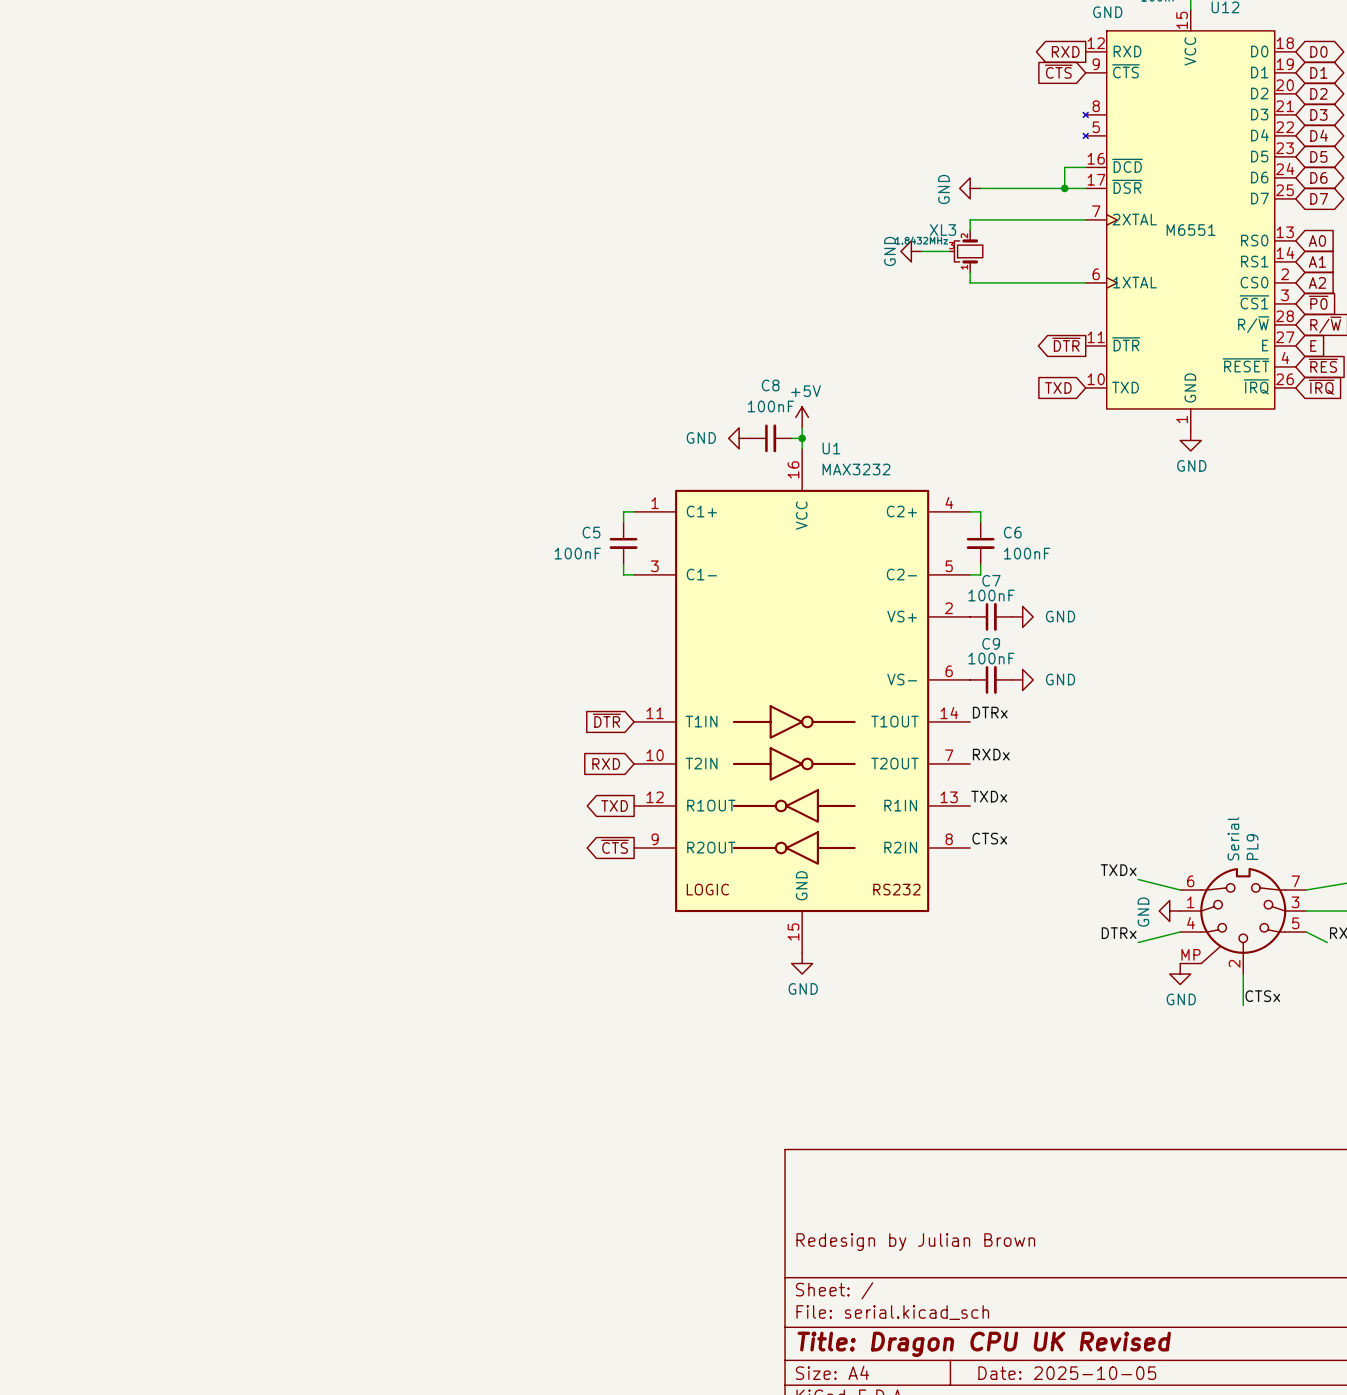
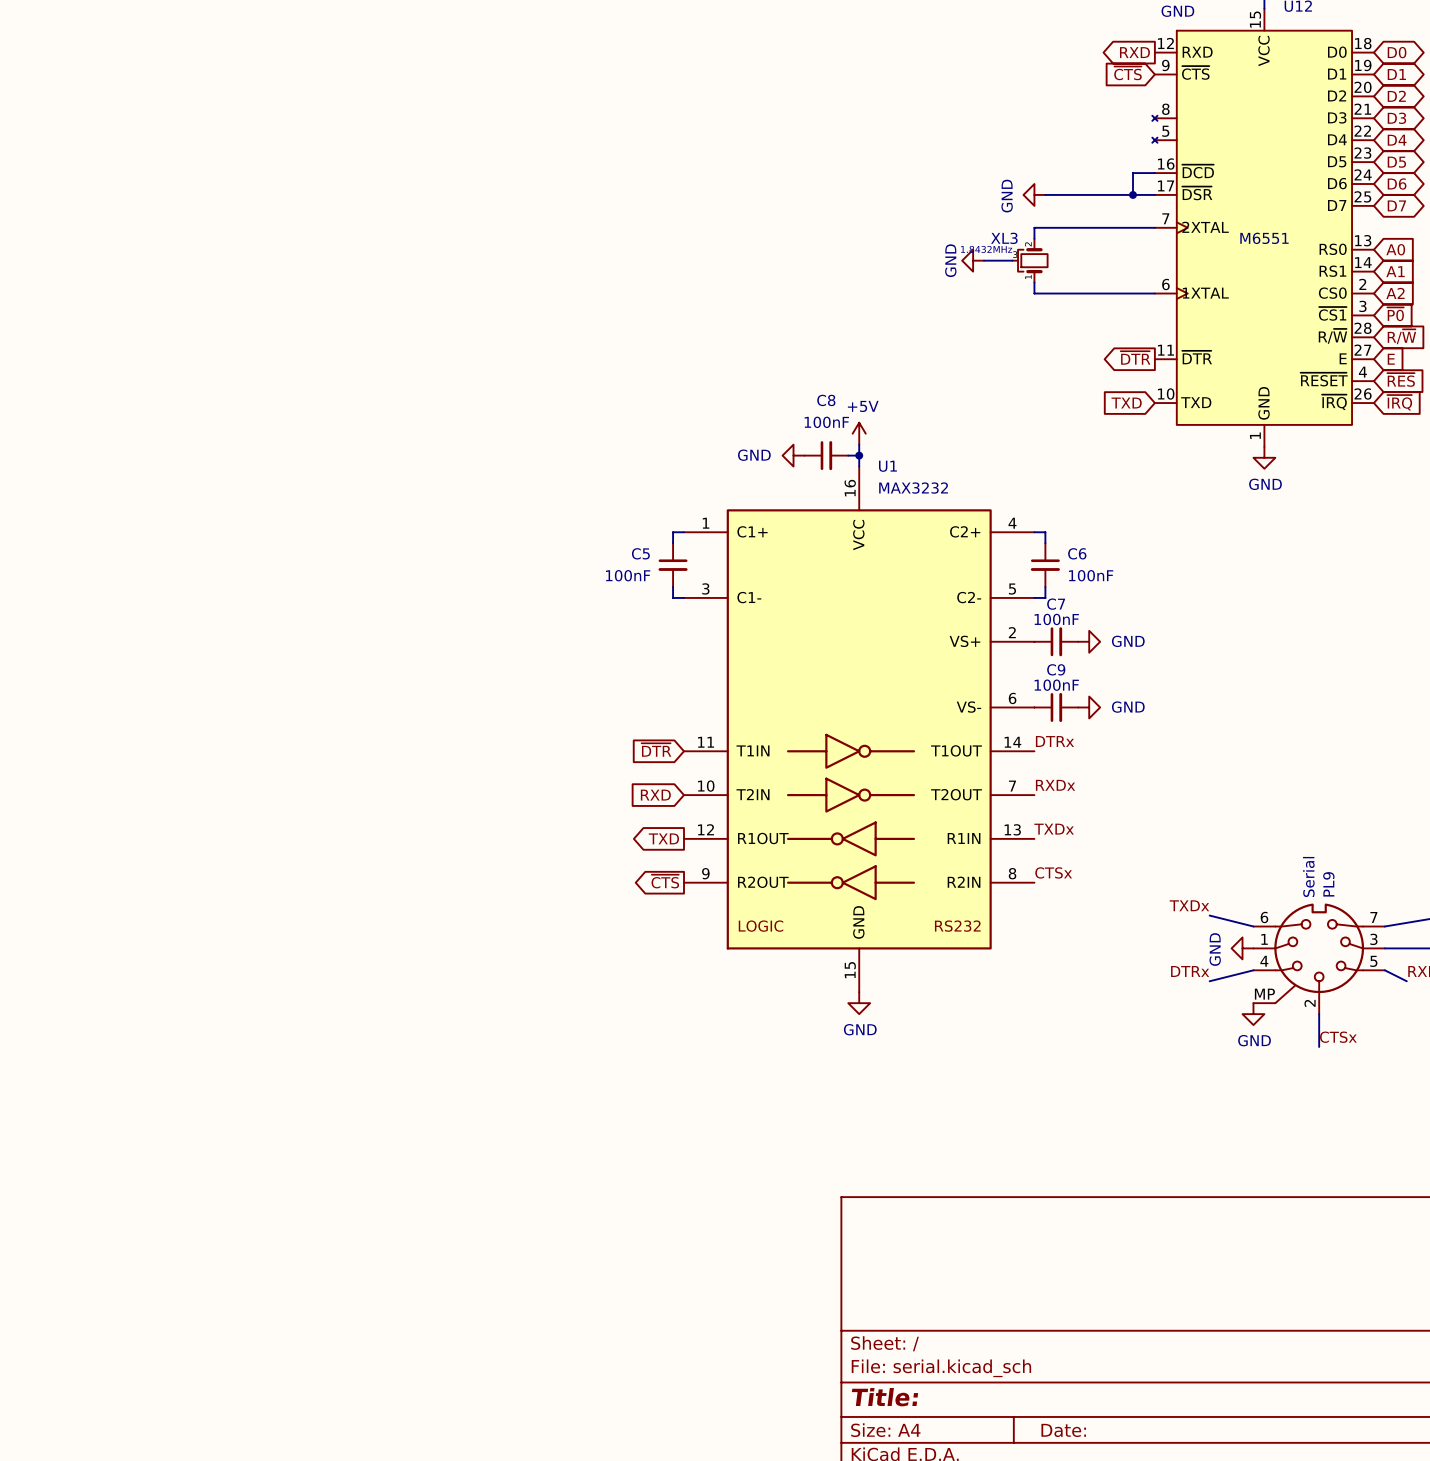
title block: Redesign by Julian Brown (915, 1242) -> none
title block: Title: Dragon CPU UK Revised (984, 1344) -> Title: (884, 1397)
title block: Date: 2025-10-05 (1067, 1373) -> Date: (1063, 1430)

